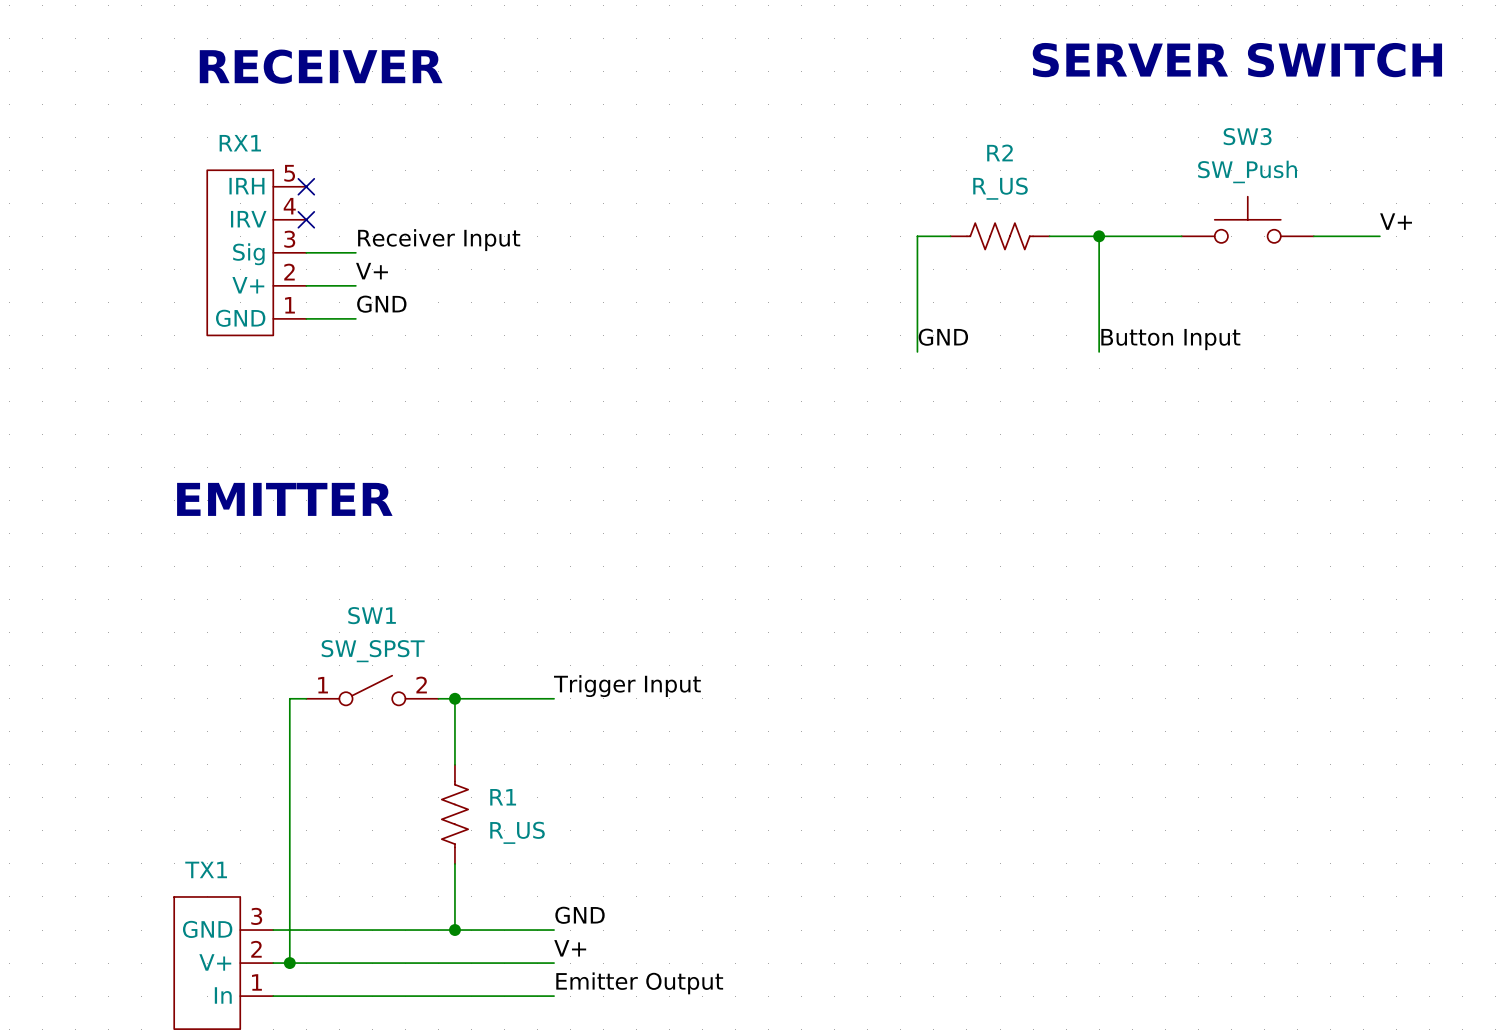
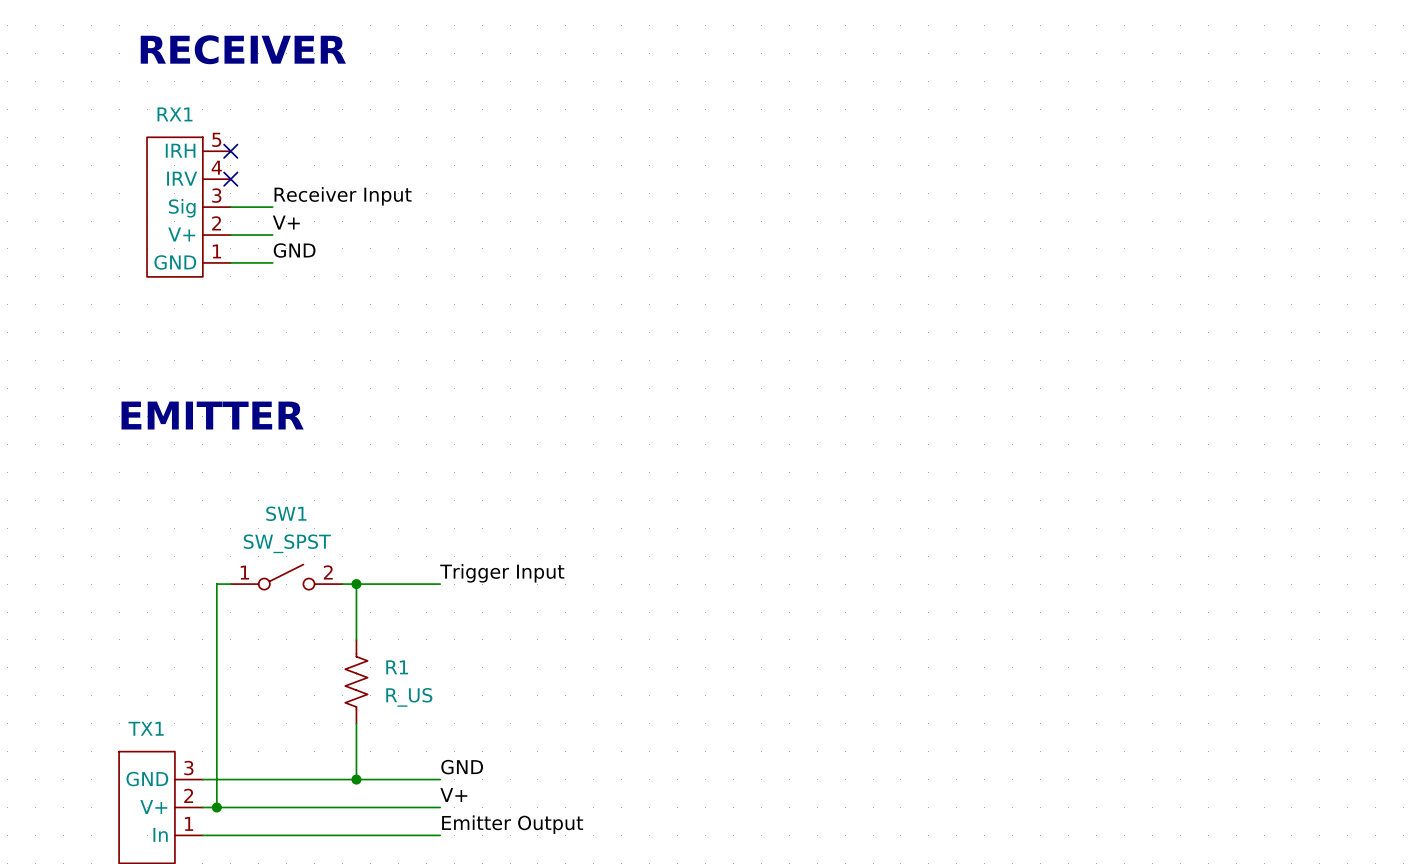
text: SERVER SWITCH (1237, 60) -> none
SW3: SW_Push (1247, 219) -> none
label: V+ (1396, 221) -> none
wire: (950, 236) (917, 236) (917, 351) -> none
R2: R_US (1000, 236) -> none
wire: (1049, 236) (1181, 236) -> none
wire: (1099, 236) (1099, 351) -> none
junction: (1099, 236) -> none
wire: (1313, 236) (1379, 236) -> none
label: GND (943, 337) -> none
label: Button Input (1170, 339) -> none

